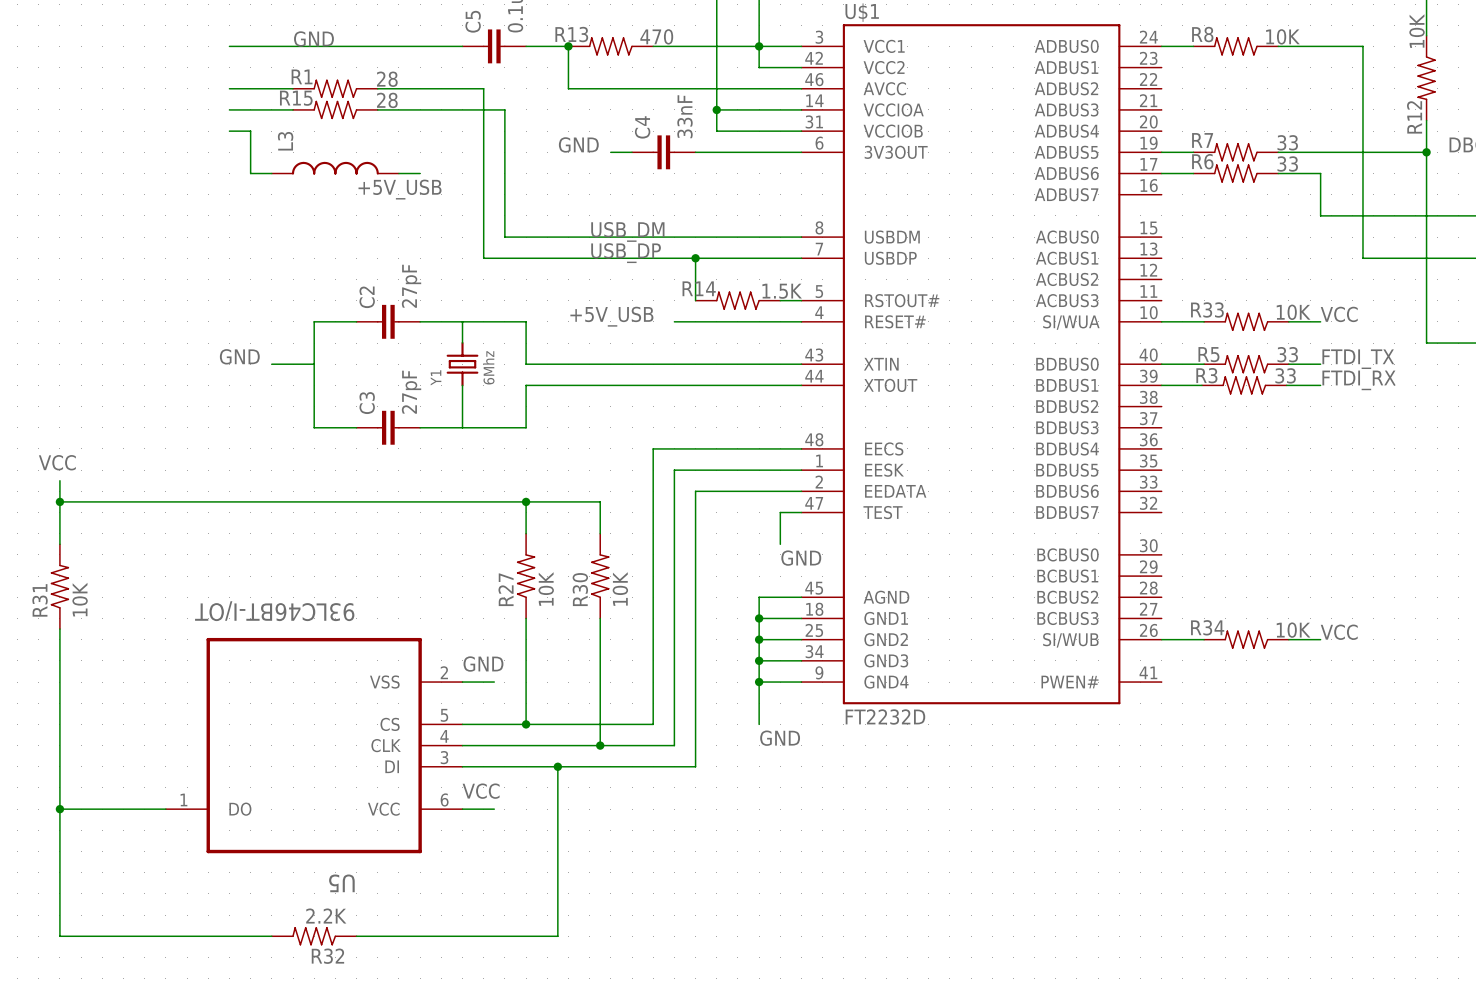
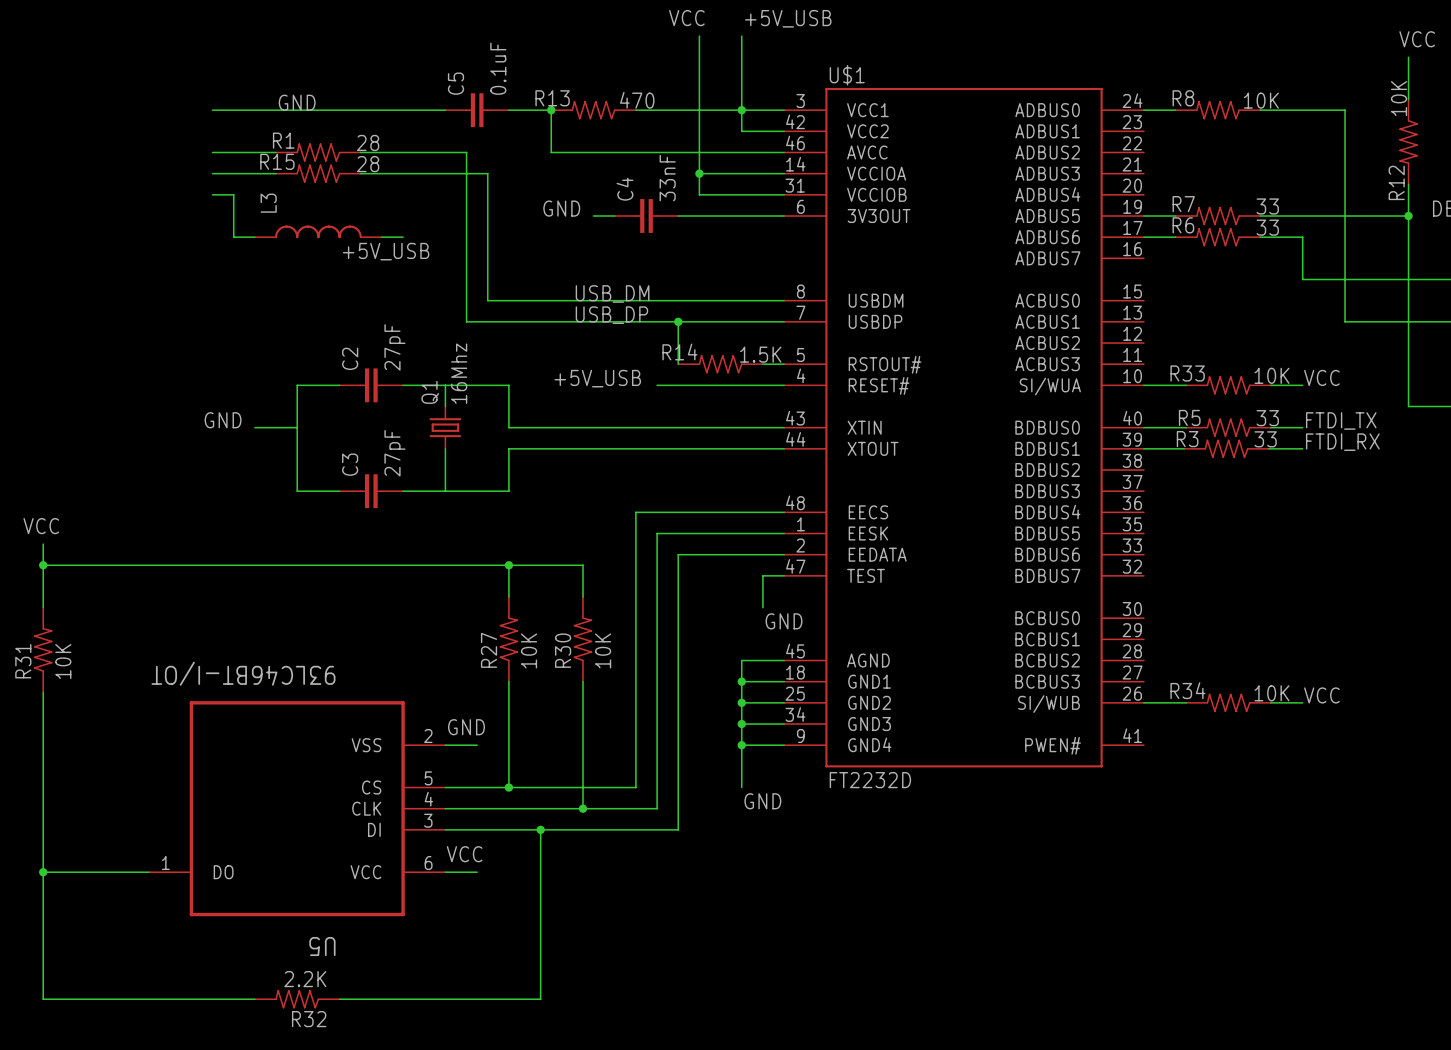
Y1: 6Mhz (462, 364) -> none
Q1: none -> 16Mhz (445, 427)

